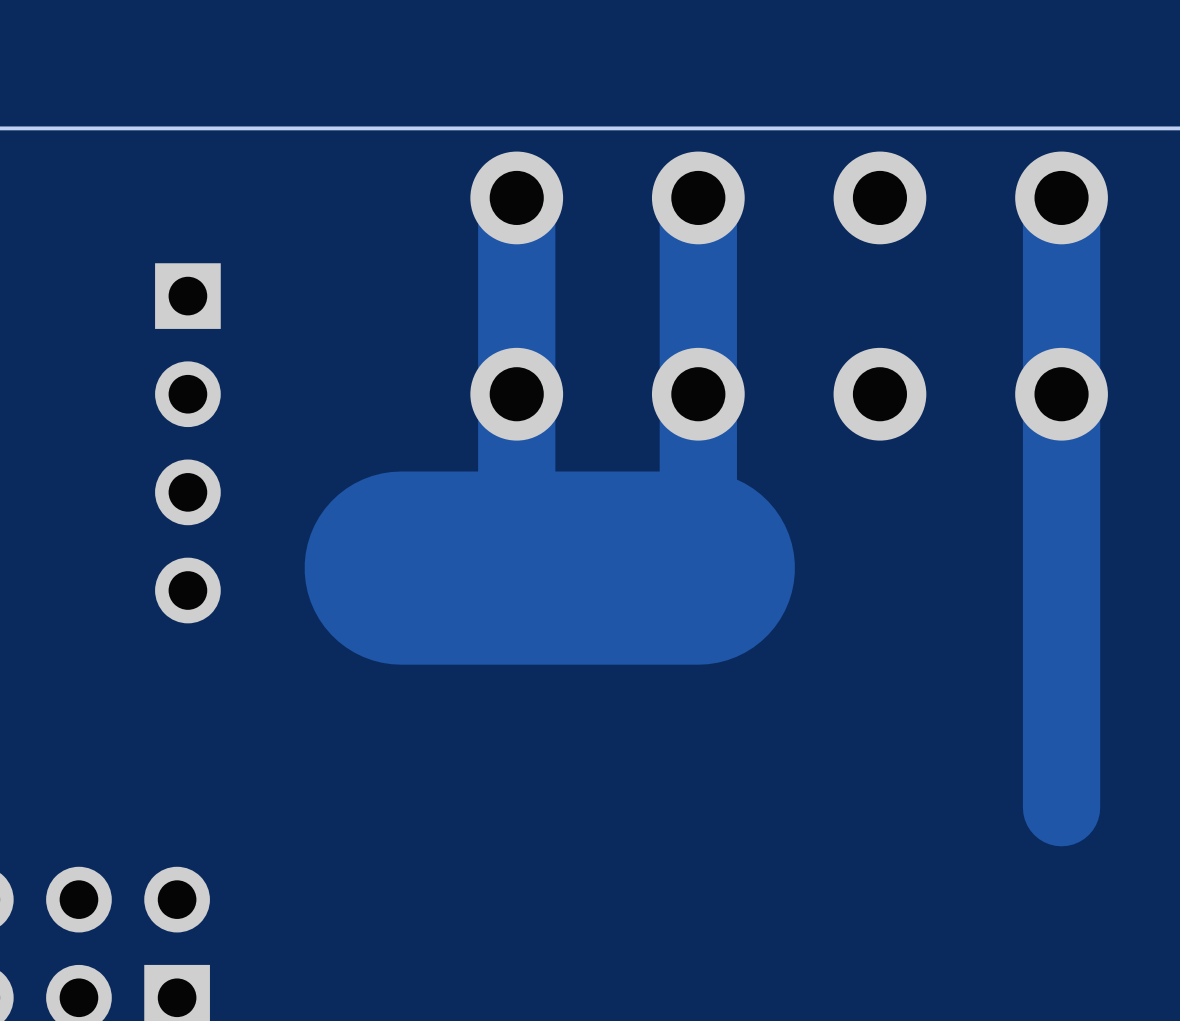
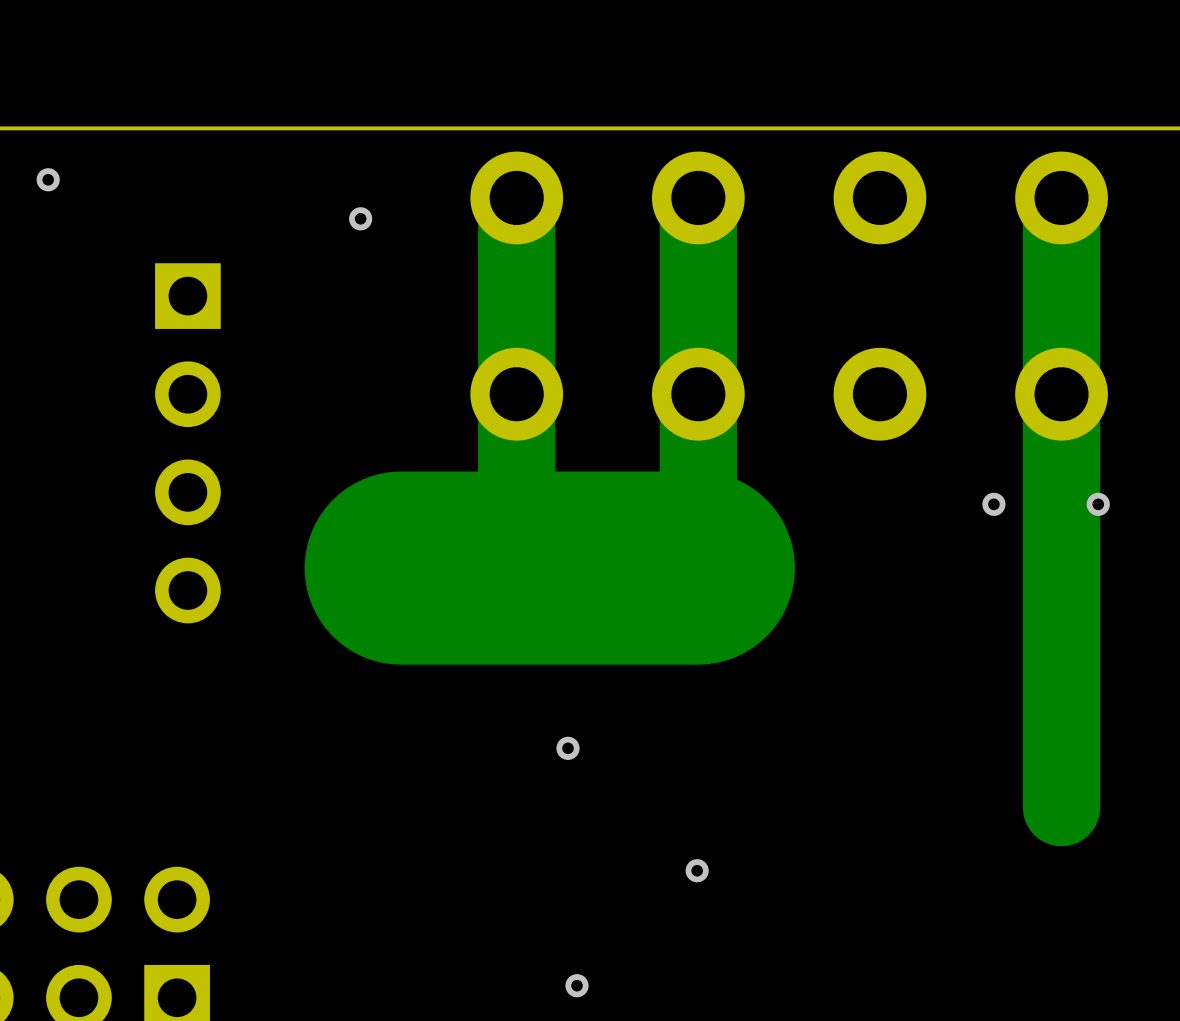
via: none -> (48, 179)
via: none -> (360, 218)
via: none -> (993, 504)
via: none -> (1098, 504)
via: none -> (568, 748)
via: none -> (697, 870)
via: none -> (577, 985)

